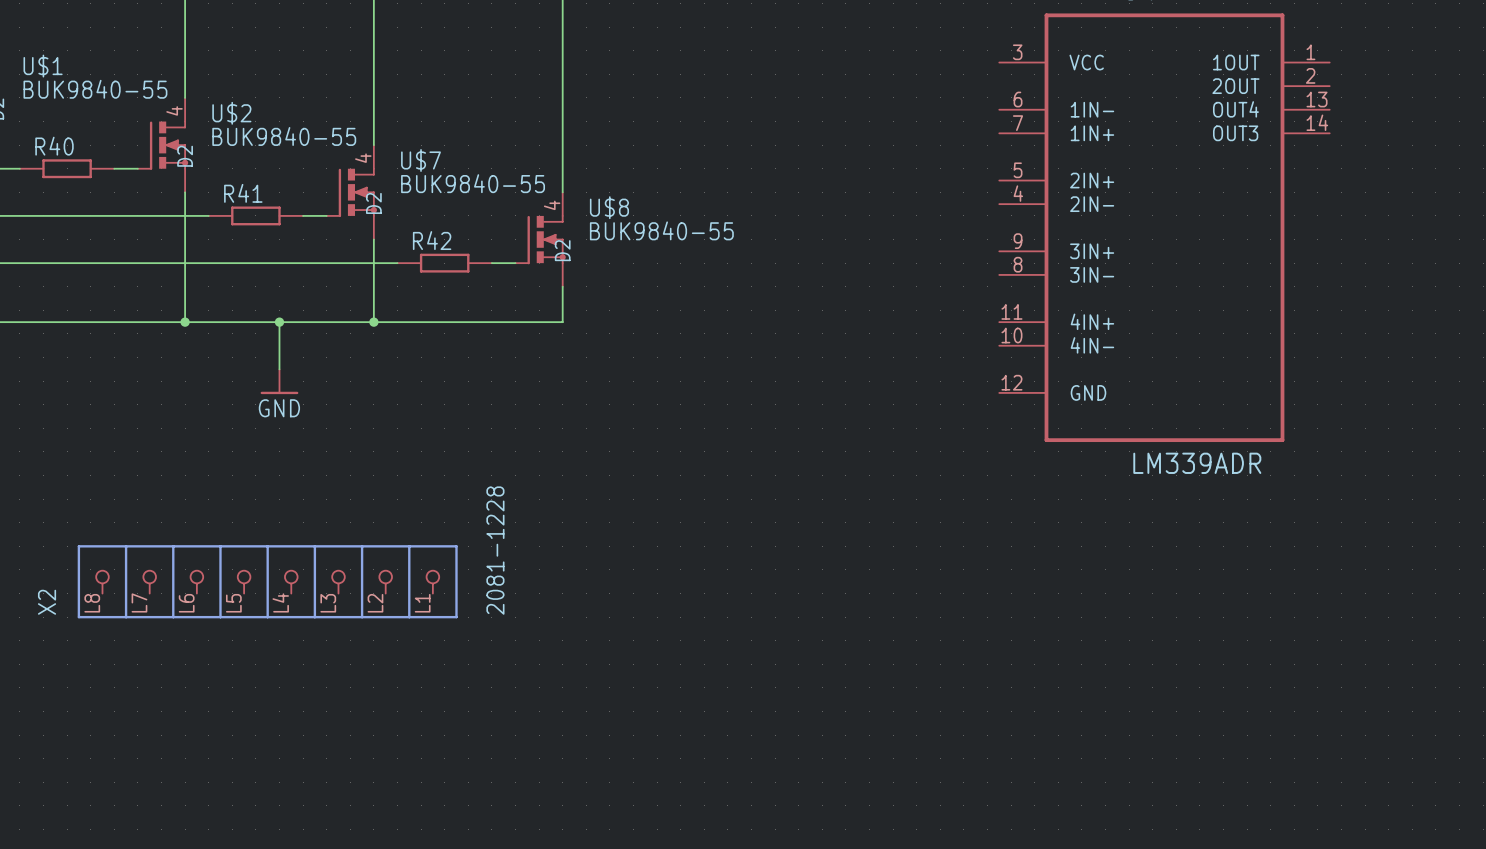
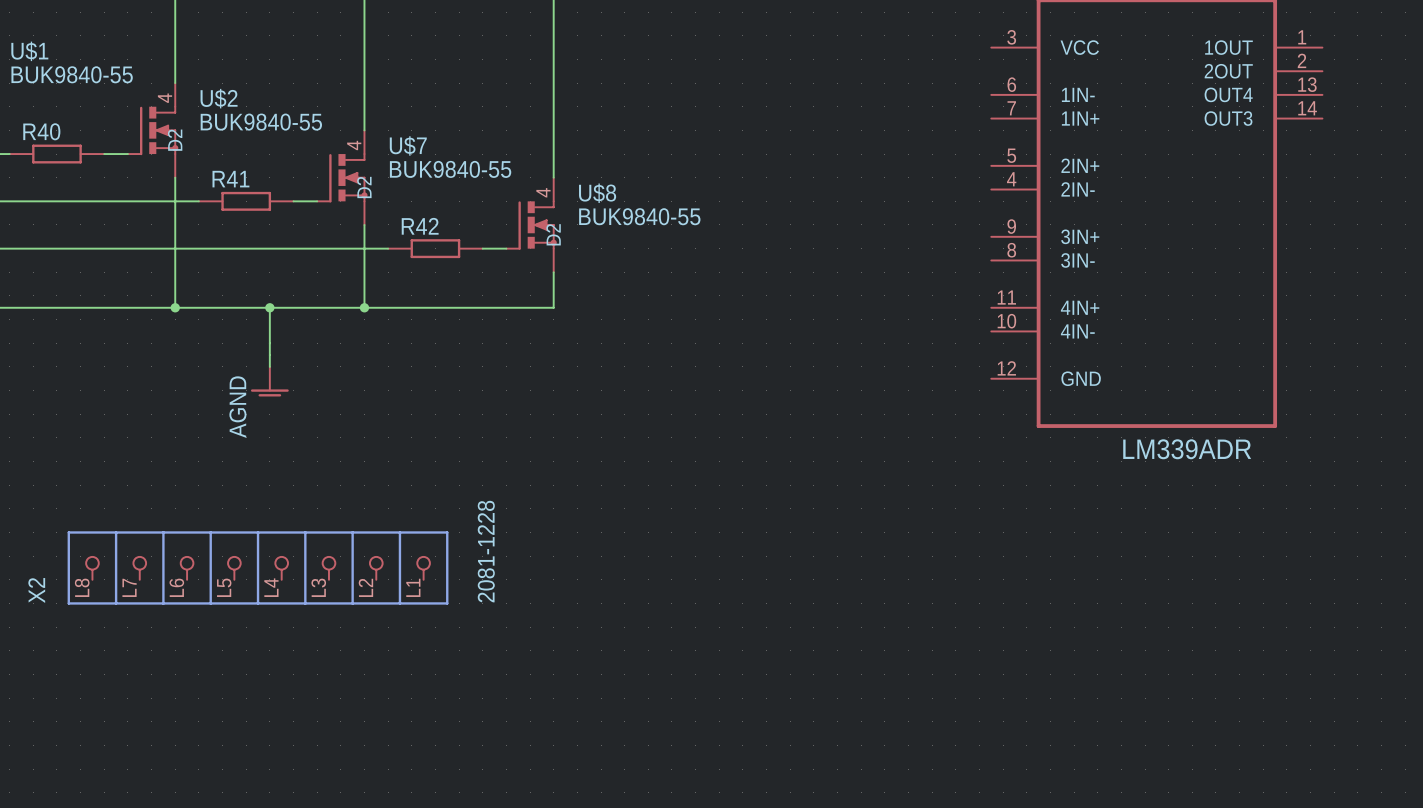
power symbol: GND (279, 381) -> none
power symbol: none -> AGND (269, 381)

